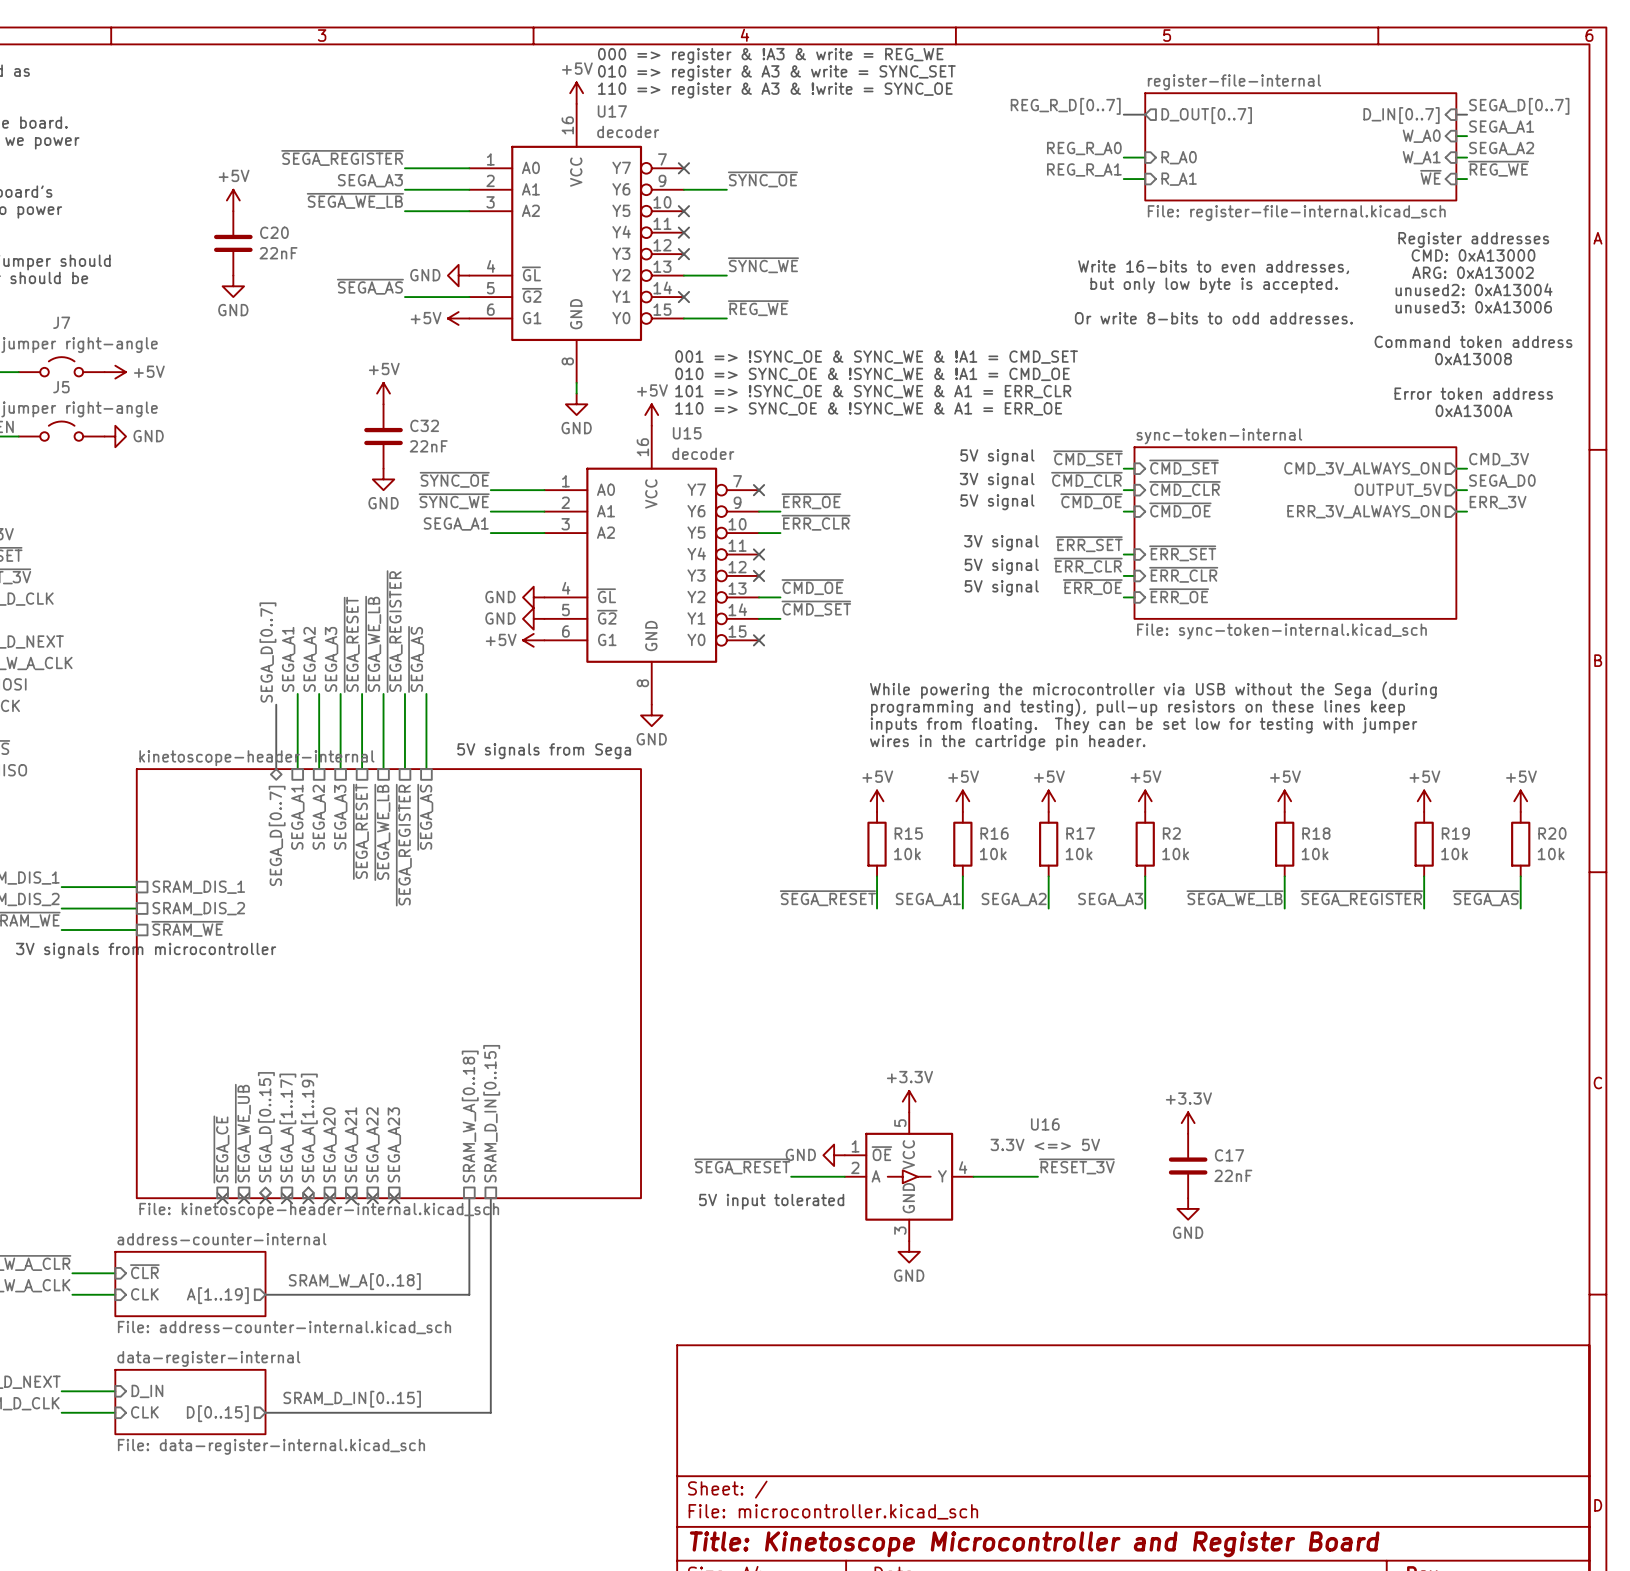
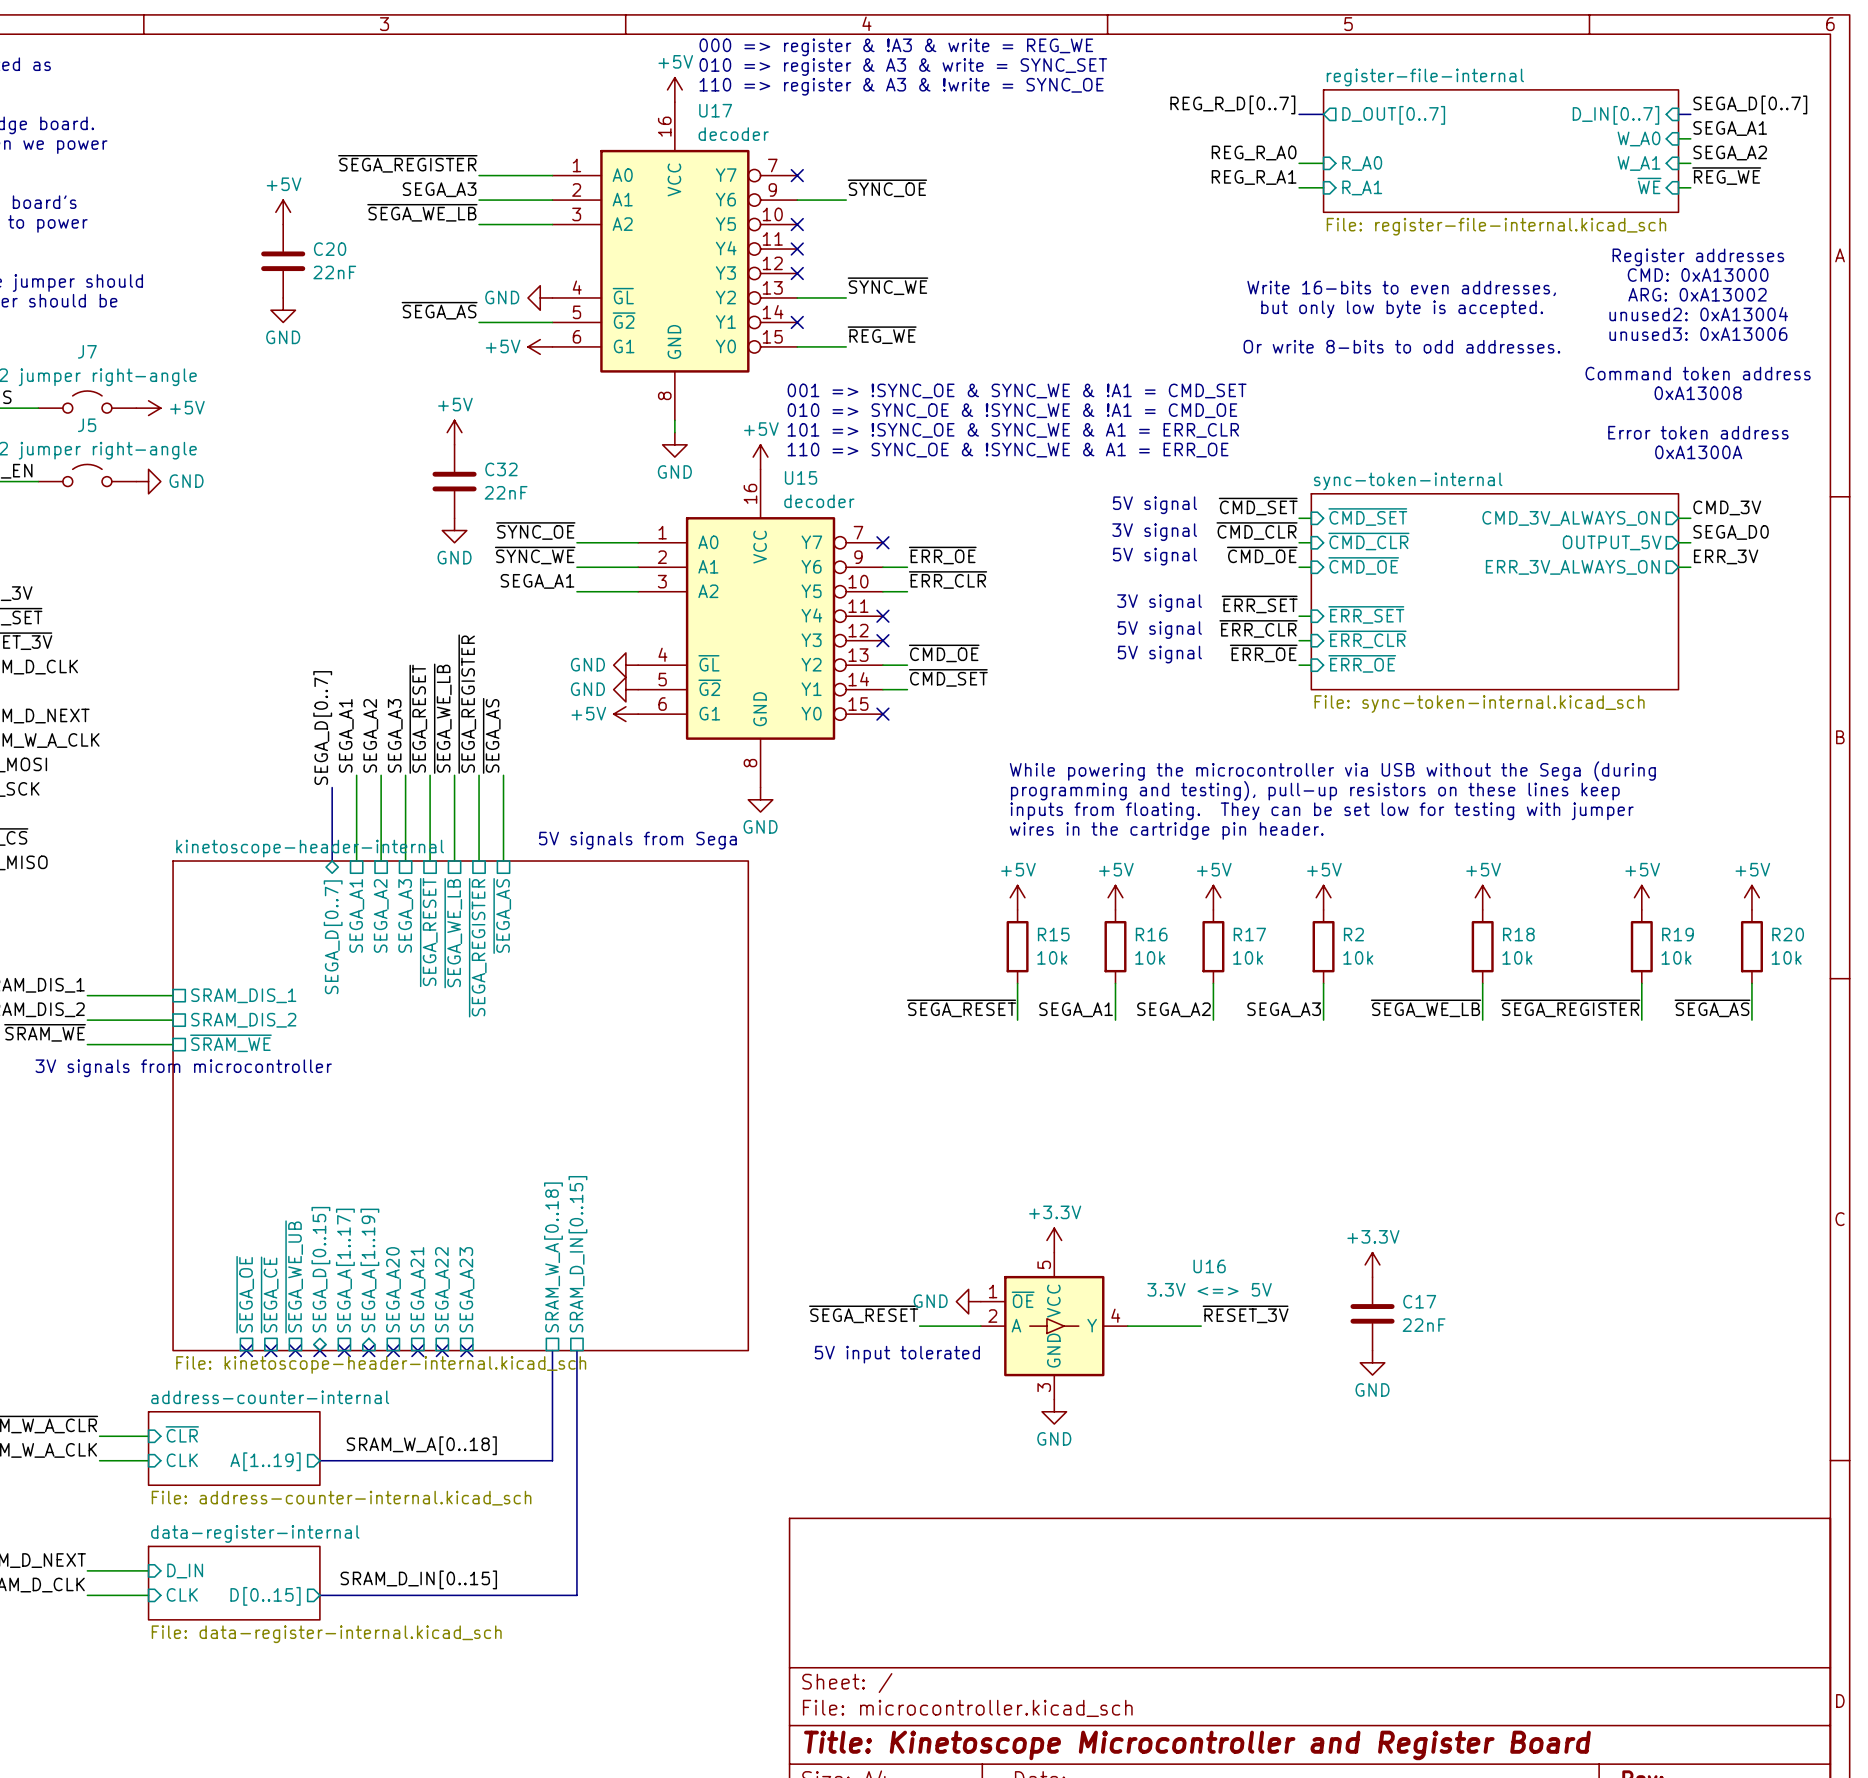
sheet pin: none -> ~{SEGA_OE} (245, 1294)
no-connect mark: none -> (246, 1350)

